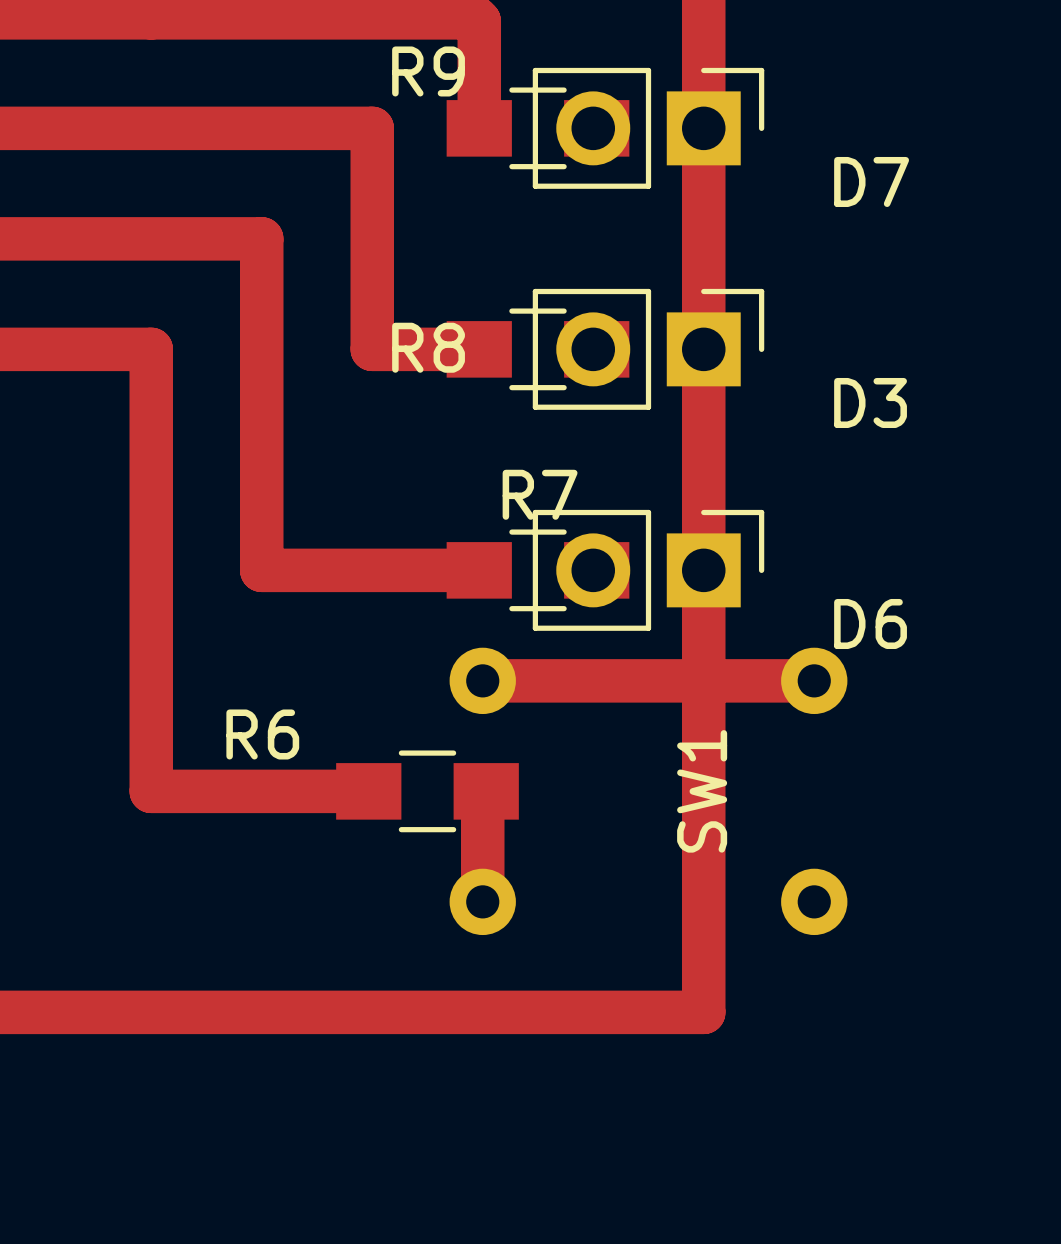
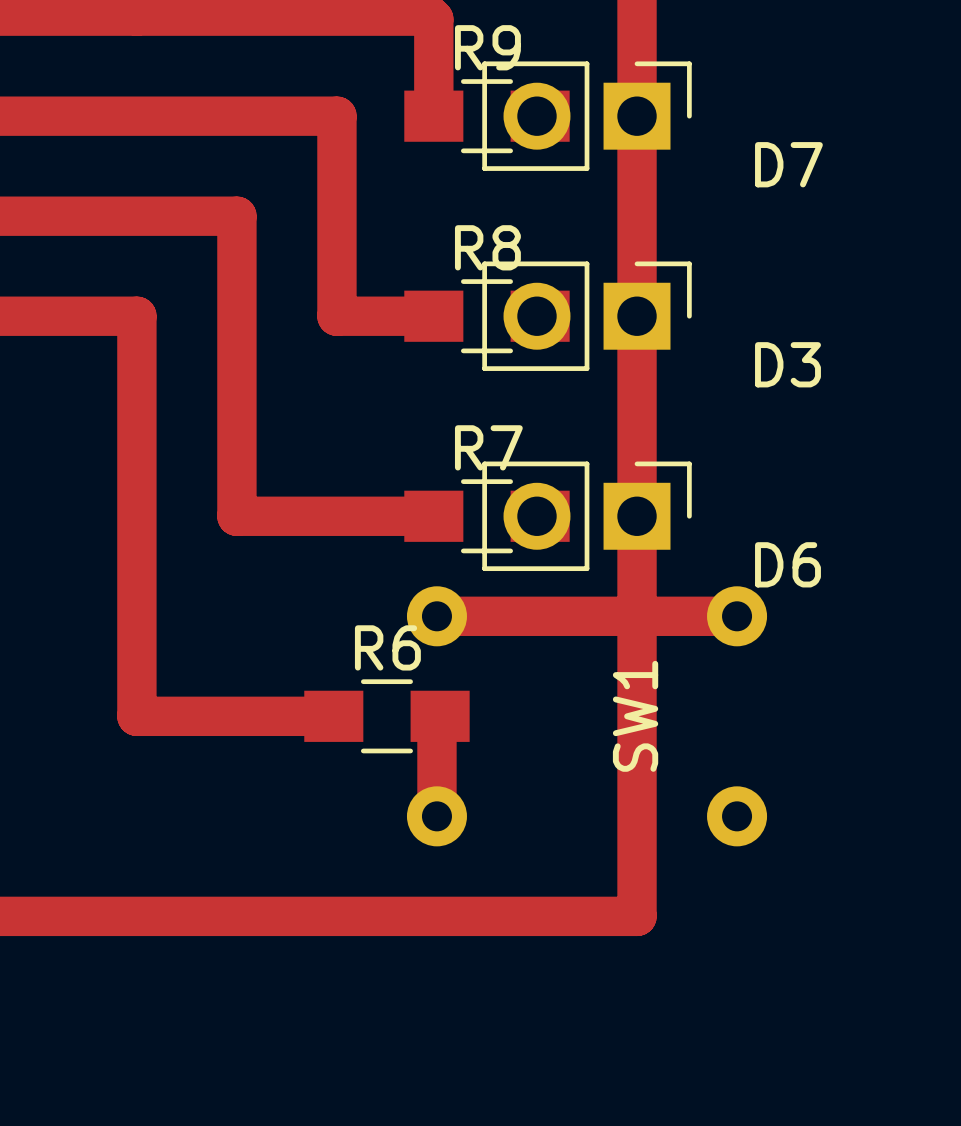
R9 name position: R9 (428, 71) -> R9 (487, 47)
R8 name position: R8 (428, 347) -> R8 (487, 247)
R6 name position: R6 (262, 734) -> R6 (387, 647)

